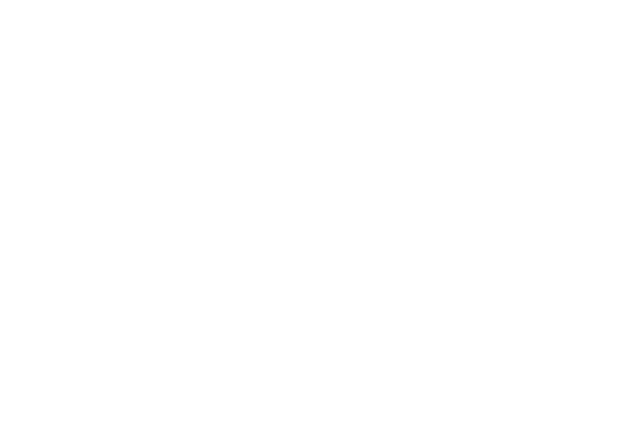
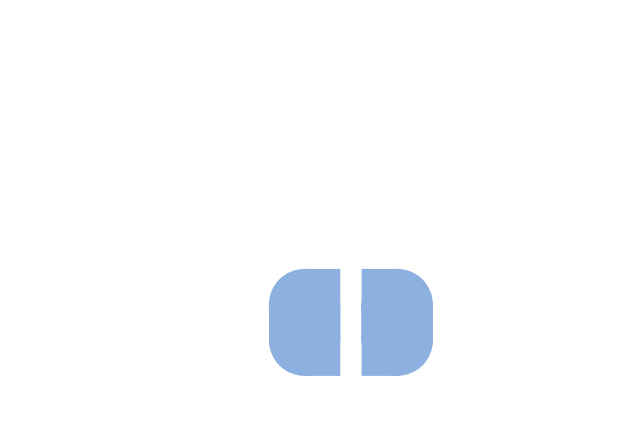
part: none -> (350, 322)

